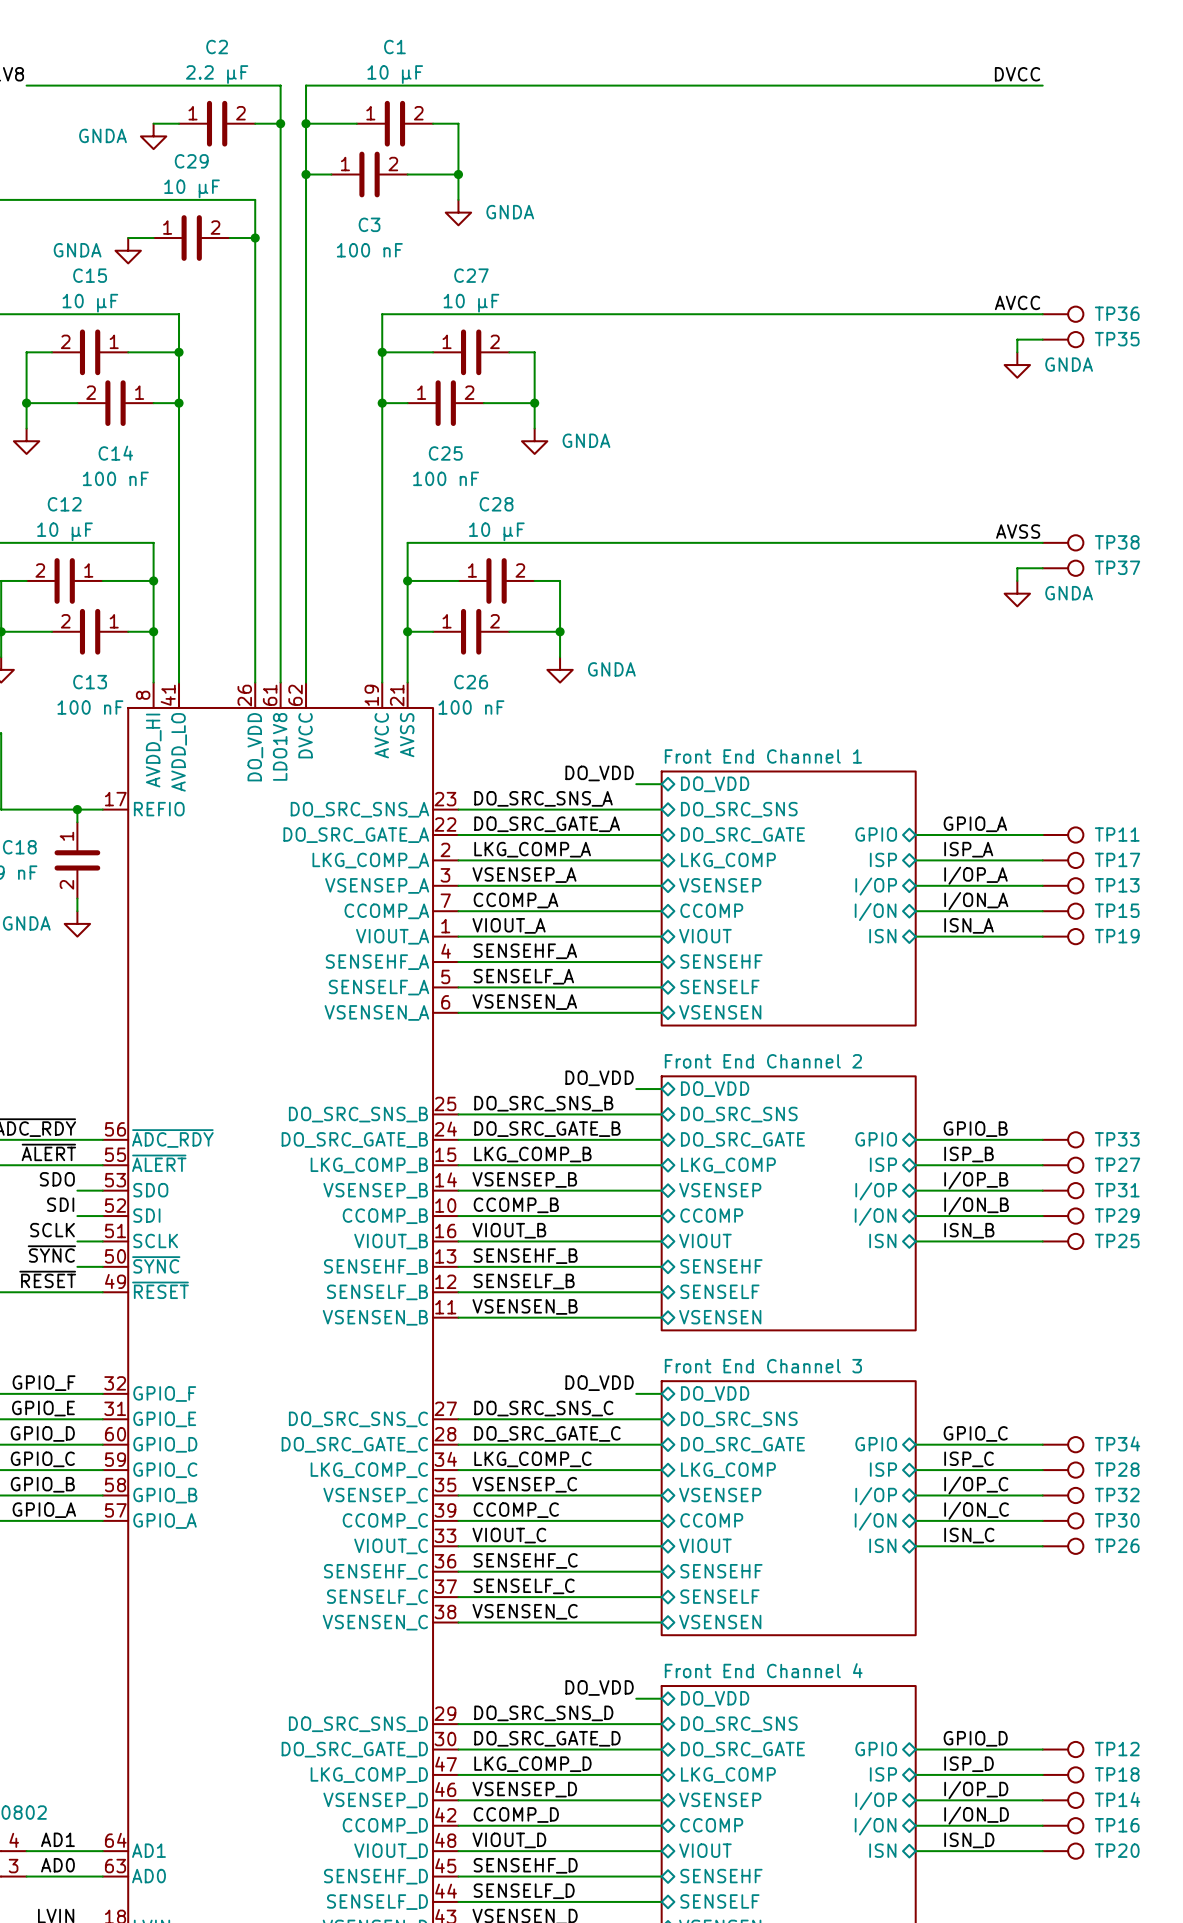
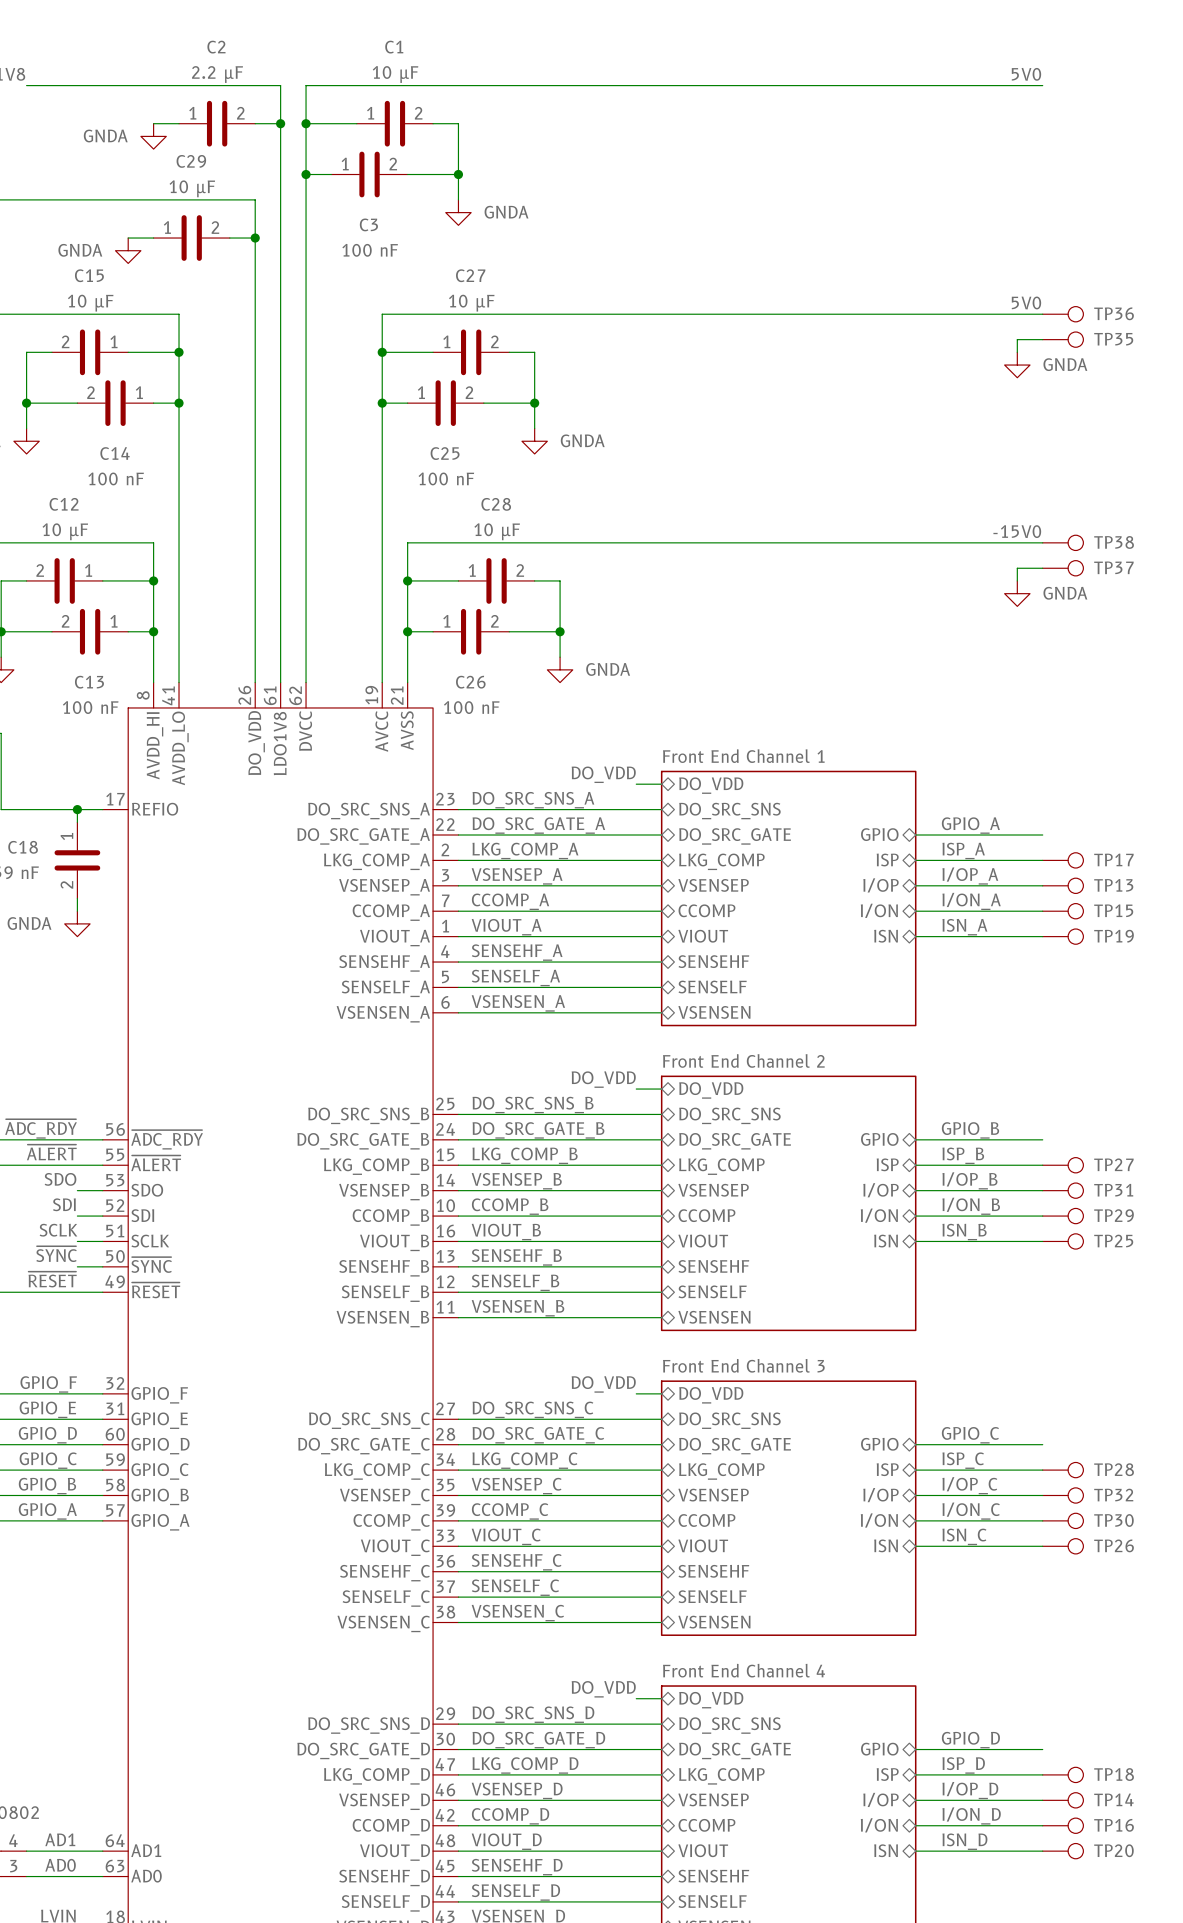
label: DVCC (1017, 74) -> 5V0 (1026, 74)
label: AVCC (1017, 302) -> 5V0 (1026, 302)
label: AVSS (1018, 531) -> -15V0 (1017, 531)
TP11: (1063, 835) -> none
TP33: (1063, 1139) -> none
TP34: (1063, 1444) -> none
TP12: (1063, 1749) -> none

